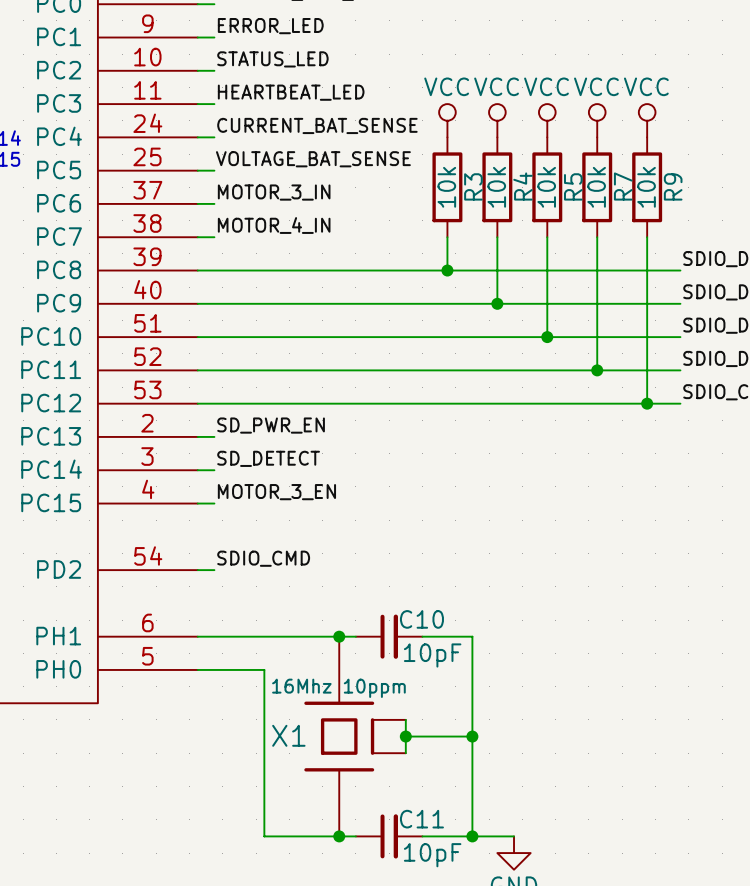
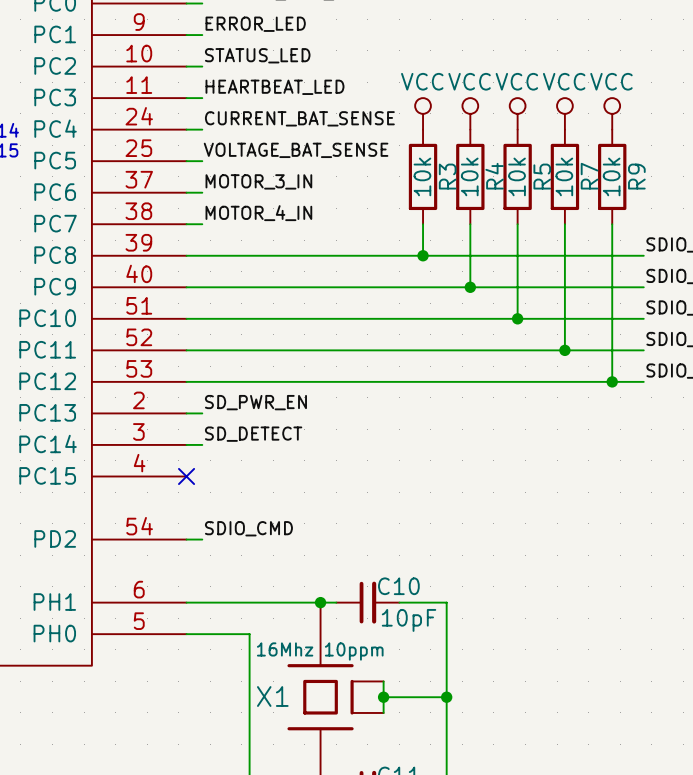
label: MOTOR_3_EN (276, 492) -> none
wire: (197, 503) (214, 503) -> none
no-connect mark: none -> (186, 476)

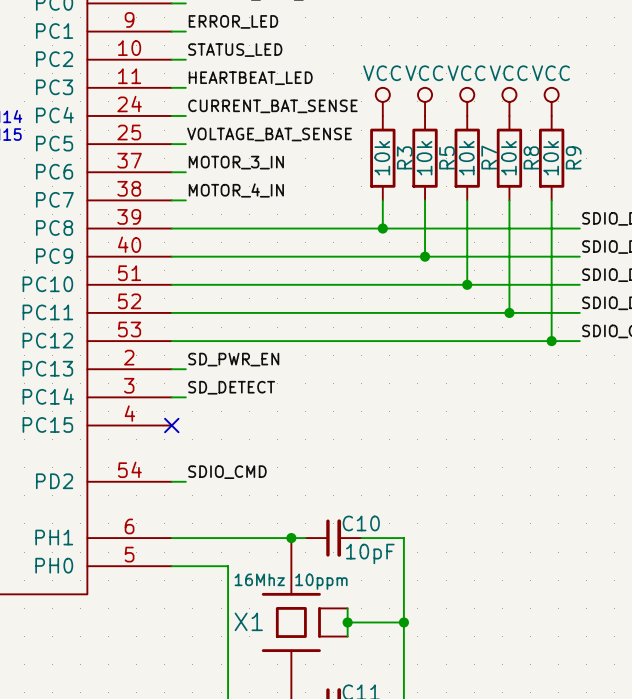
R4 name: R4 (494, 176) -> R5 (447, 157)
R5 name: R5 (542, 176) -> R7 (489, 157)
R7 name: R7 (589, 176) -> R8 (531, 157)

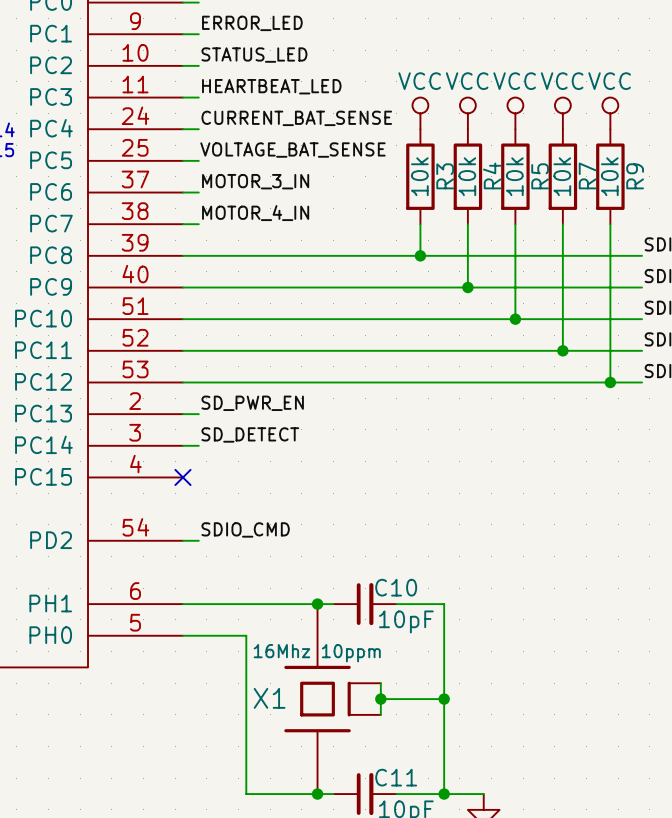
R5 name: R5 (447, 157) -> R4 (492, 175)
R7 name: R7 (489, 157) -> R5 (540, 176)
R8 name: R8 (531, 157) -> R7 (587, 175)

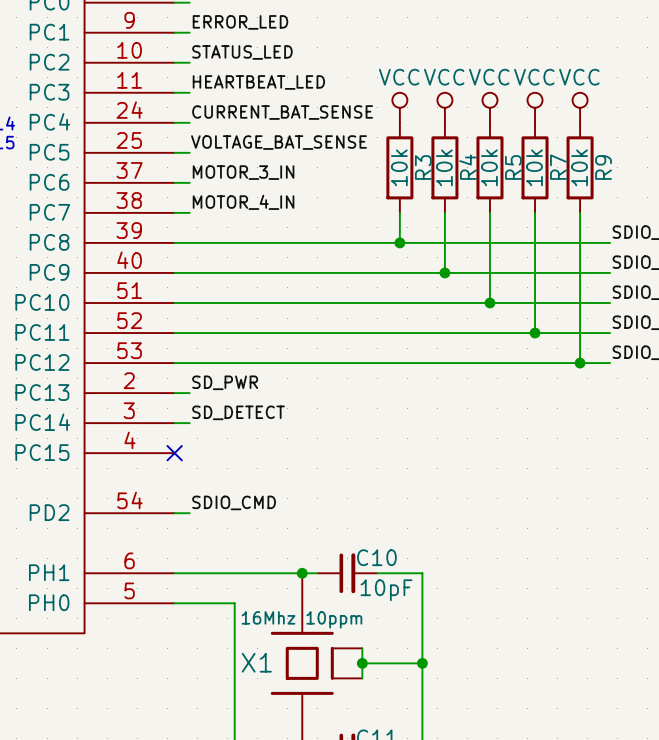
label: SD_PWR_EN (252, 403) -> SD_PWR (225, 382)

